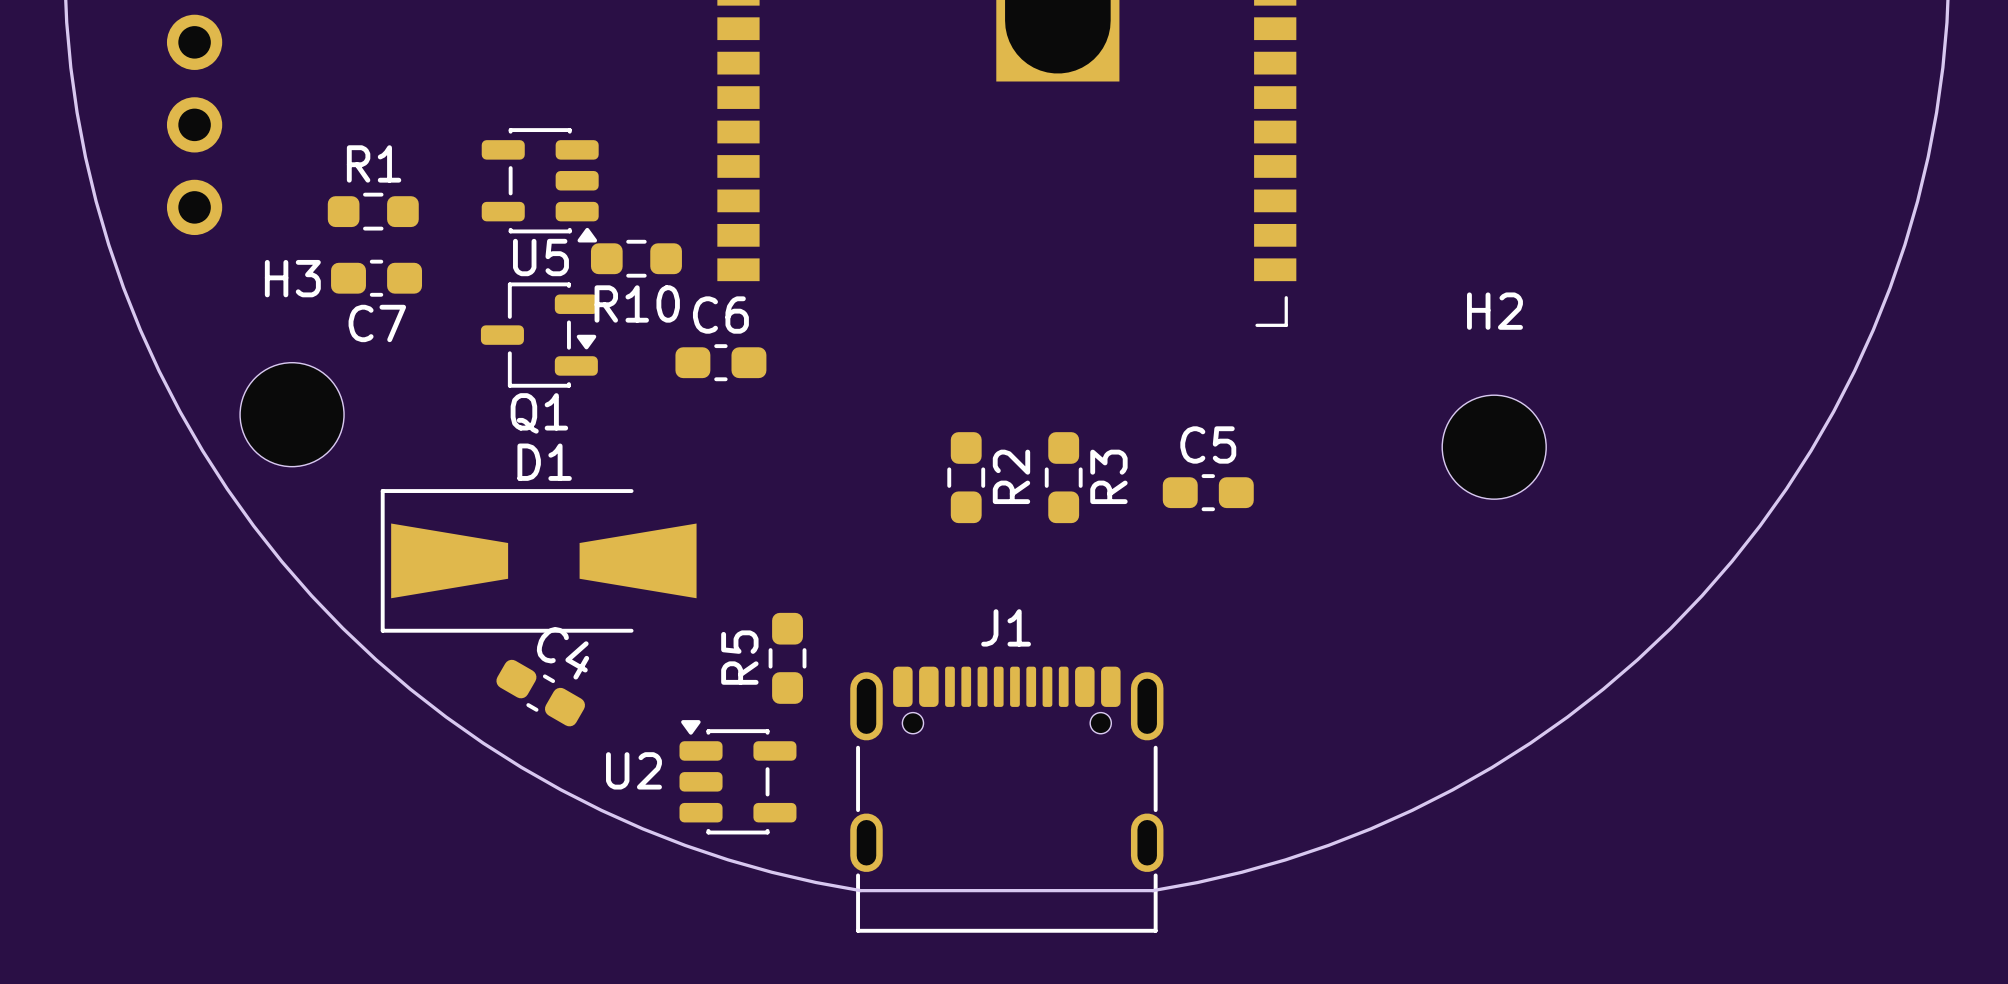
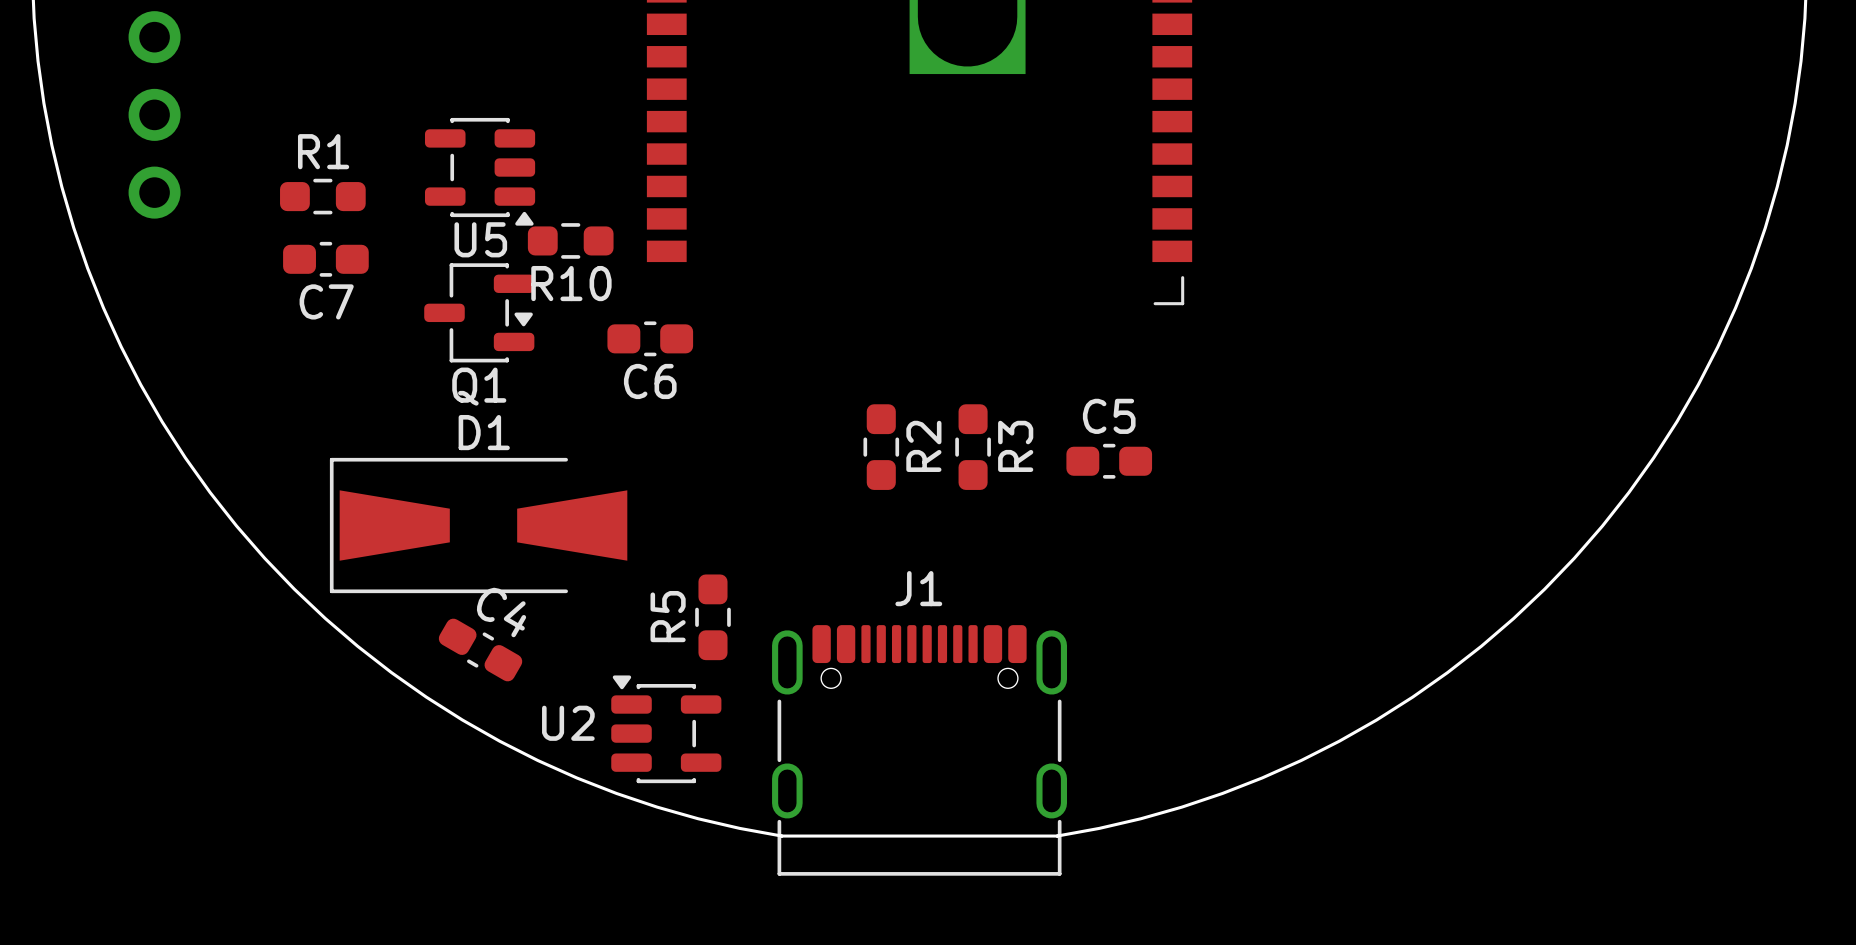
C6 name position: C6 (720, 315) -> C6 (650, 381)
H3: (292, 414) -> none
H2: (1494, 447) -> none

